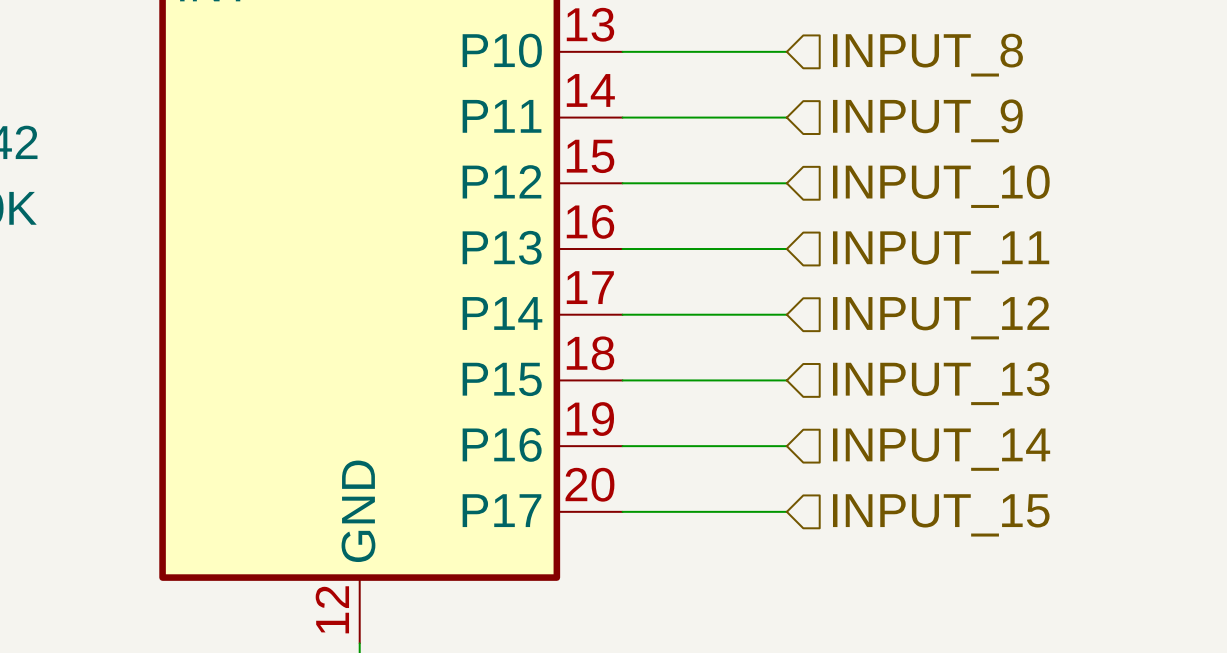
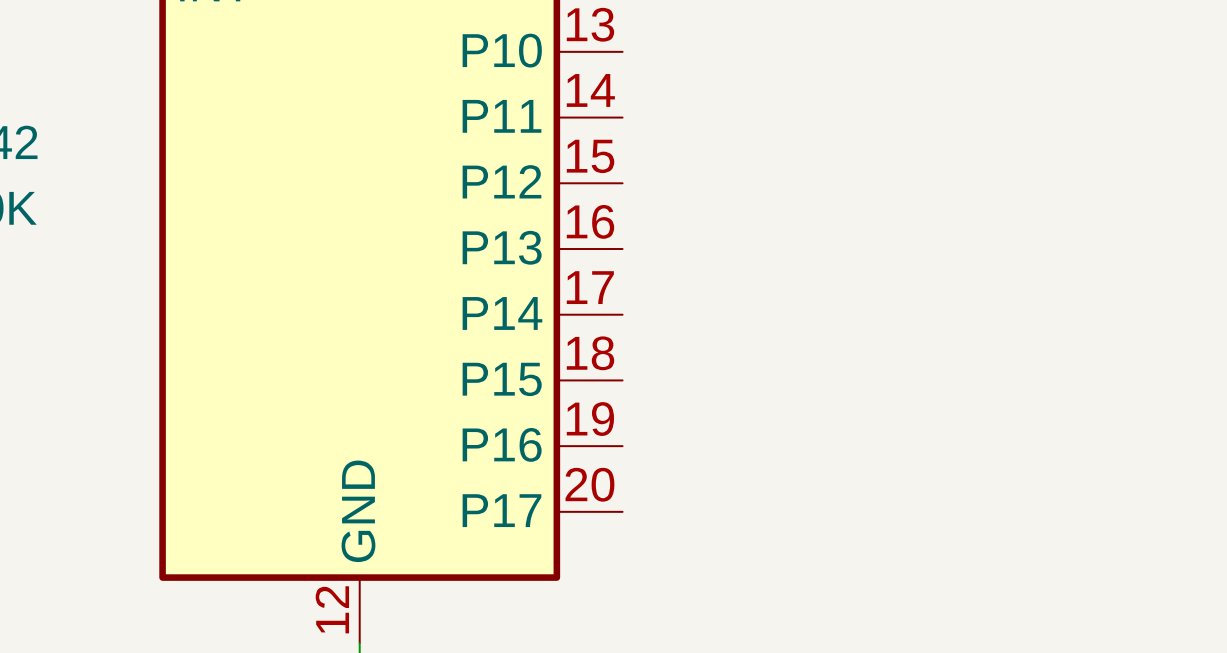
wire: (622, 51) (786, 51) -> none
hierarchical label: INPUT_8 (927, 55) -> none
wire: (622, 117) (786, 117) -> none
hierarchical label: INPUT_9 (927, 120) -> none
wire: (622, 183) (786, 183) -> none
hierarchical label: INPUT_10 (941, 186) -> none
wire: (622, 249) (786, 249) -> none
hierarchical label: INPUT_11 (941, 252) -> none
wire: (622, 314) (786, 314) -> none
hierarchical label: INPUT_12 (941, 317) -> none
wire: (622, 380) (786, 380) -> none
hierarchical label: INPUT_13 (941, 383) -> none
wire: (622, 446) (786, 446) -> none
hierarchical label: INPUT_14 (941, 449) -> none
wire: (622, 511) (786, 511) -> none
hierarchical label: INPUT_15 (941, 515) -> none

